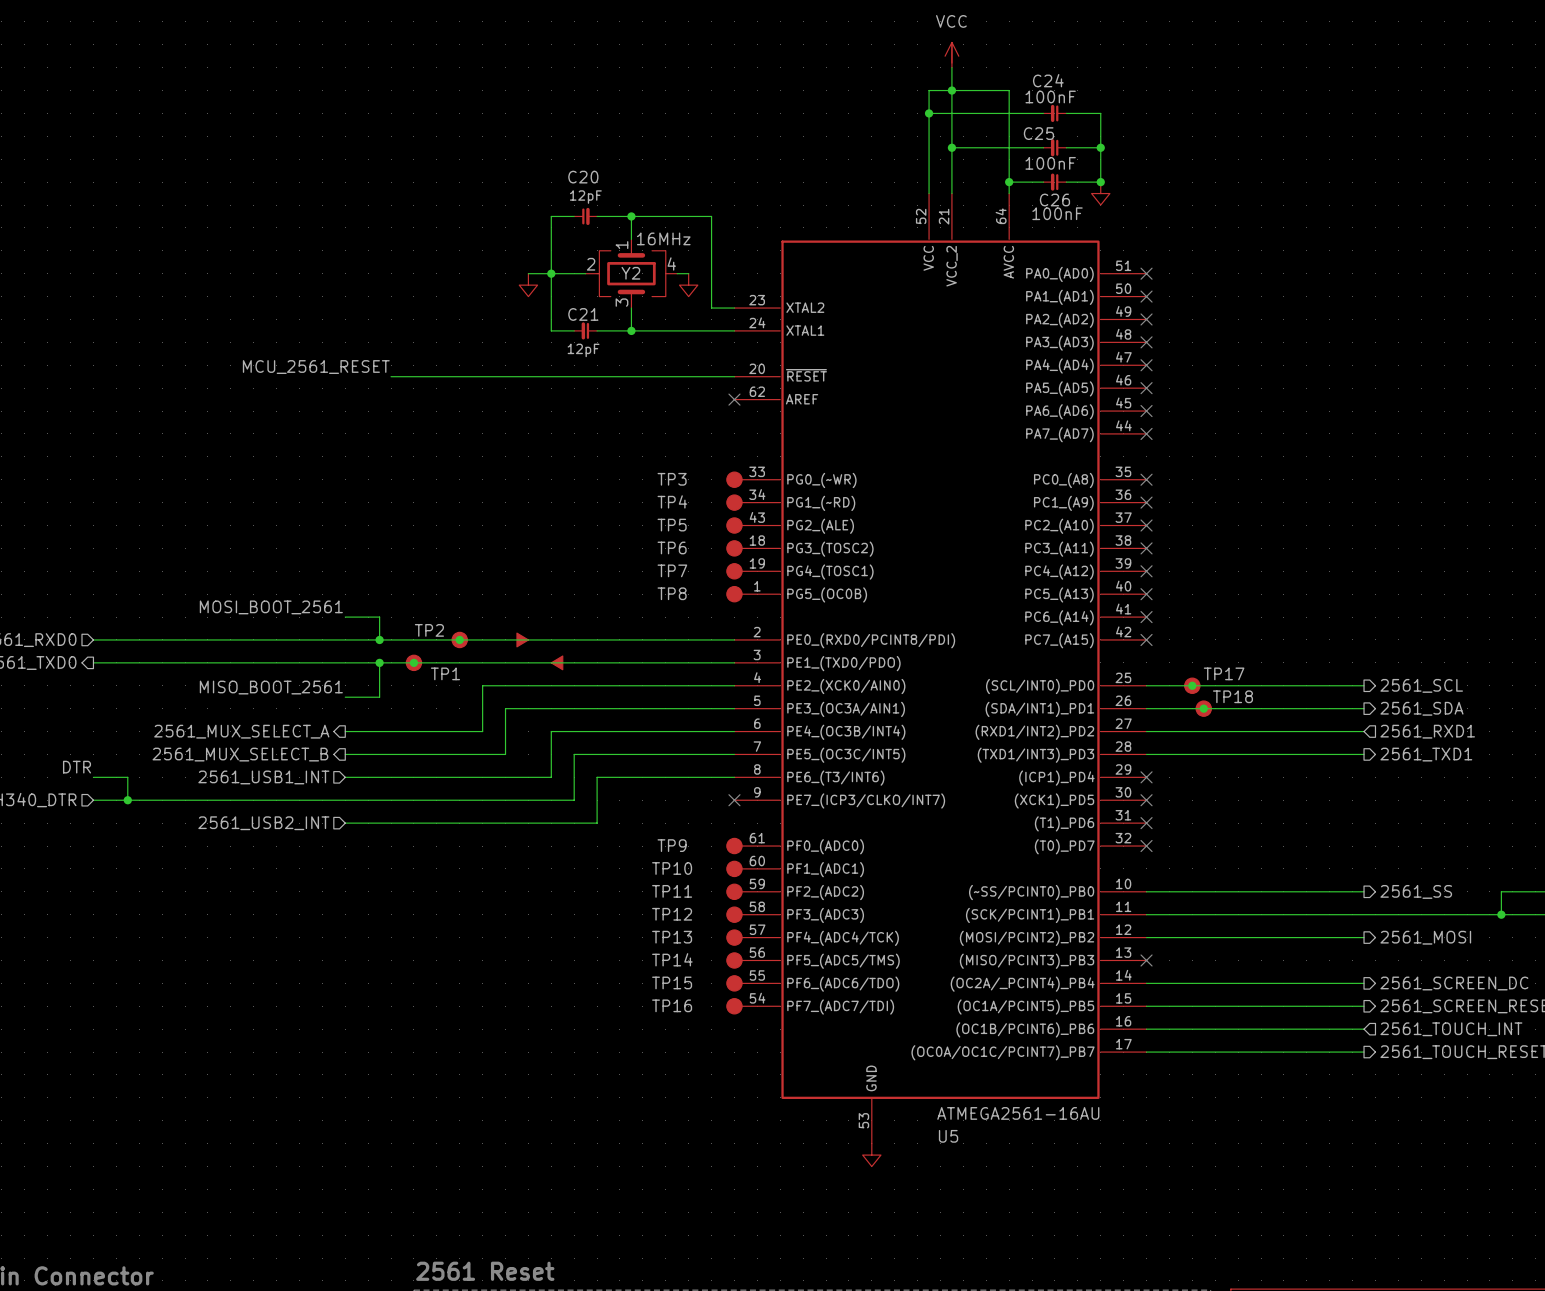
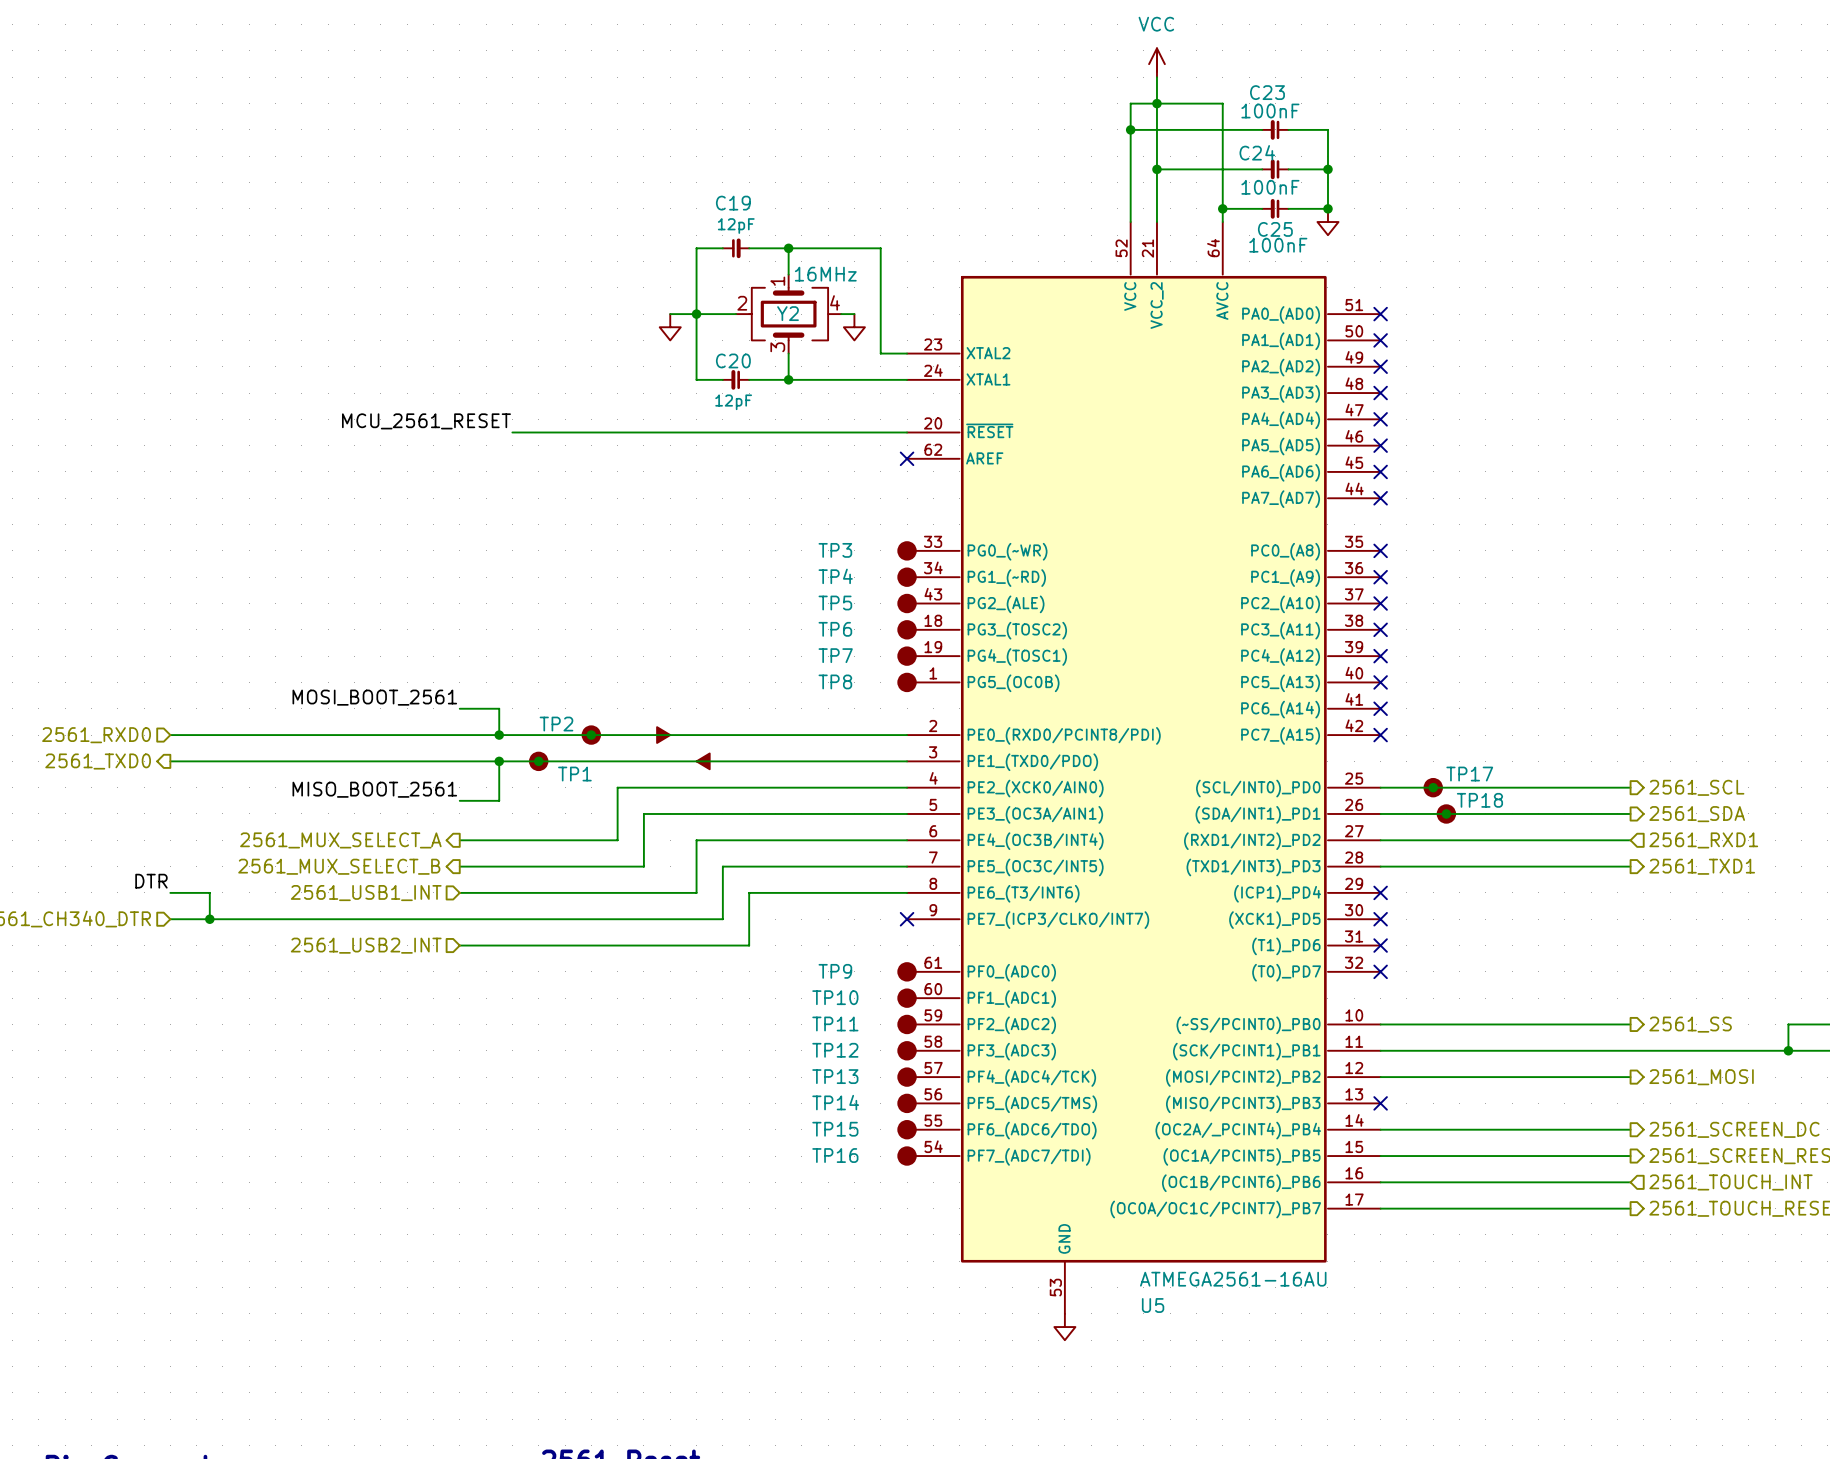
C24 name: C24 (1048, 80) -> C23 (1267, 92)
C25 name: C25 (1038, 133) -> C24 (1257, 152)
C20 name: C20 (583, 177) -> C19 (733, 203)
C26 name: C26 (1054, 200) -> C25 (1275, 229)
C21 name: C21 (583, 314) -> C20 (733, 360)

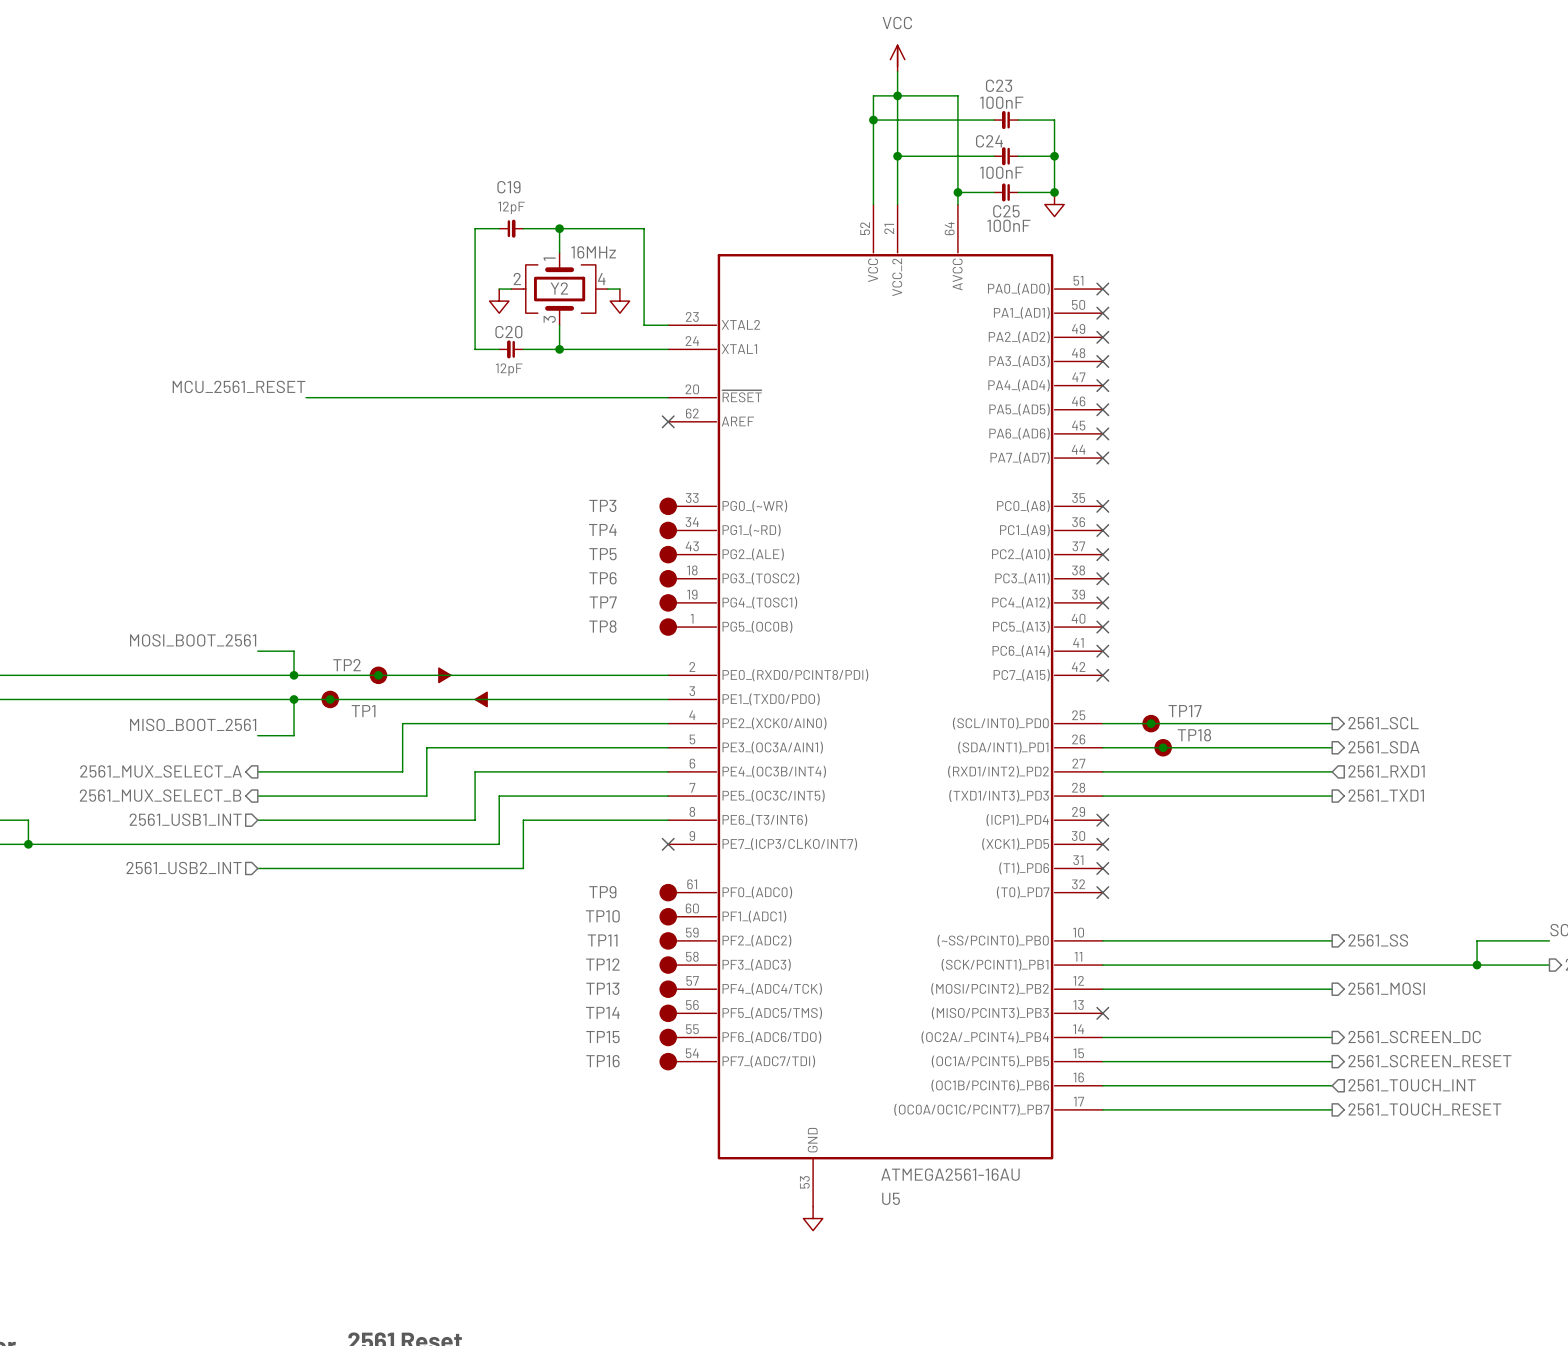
wire: (670, 314) (722, 314) -> none
junction: (696, 314) -> none
power symbol position: (670, 327) -> (499, 301)

